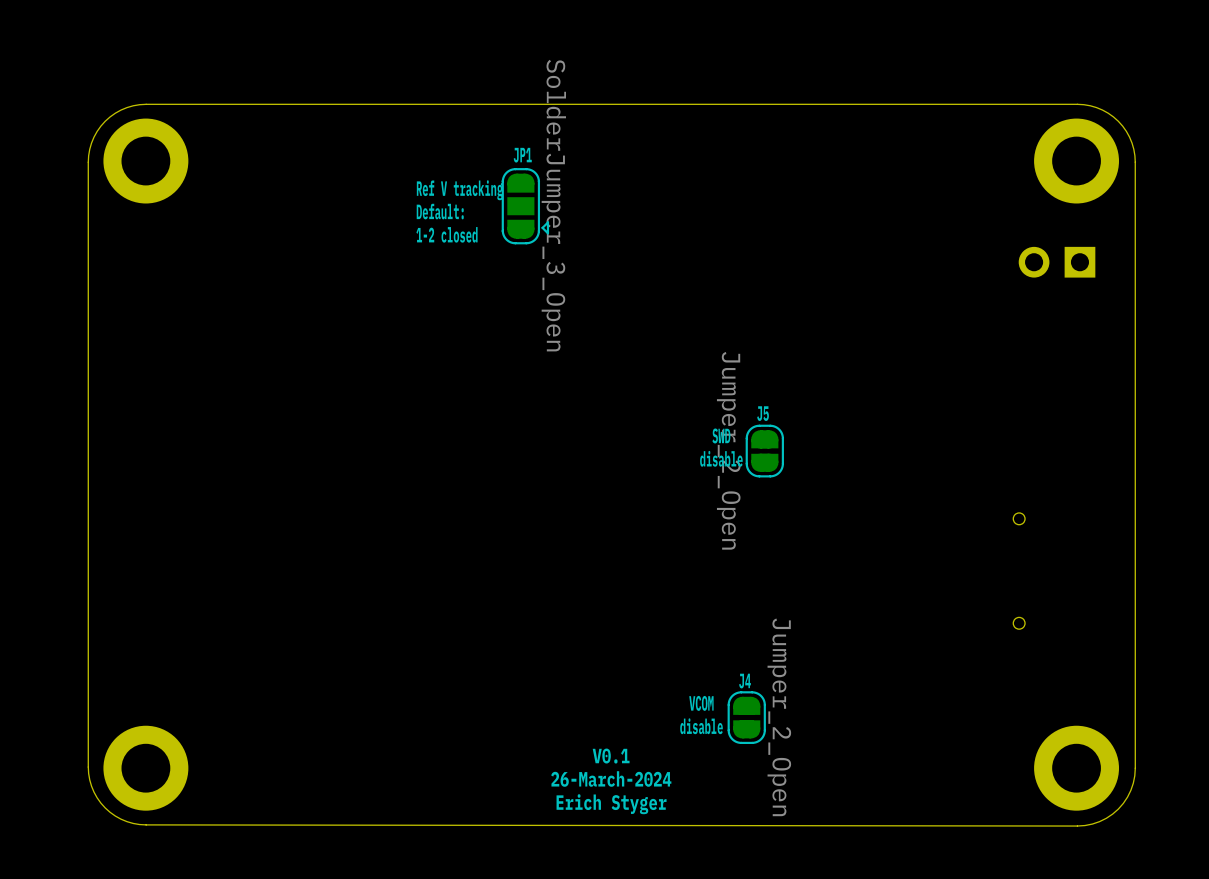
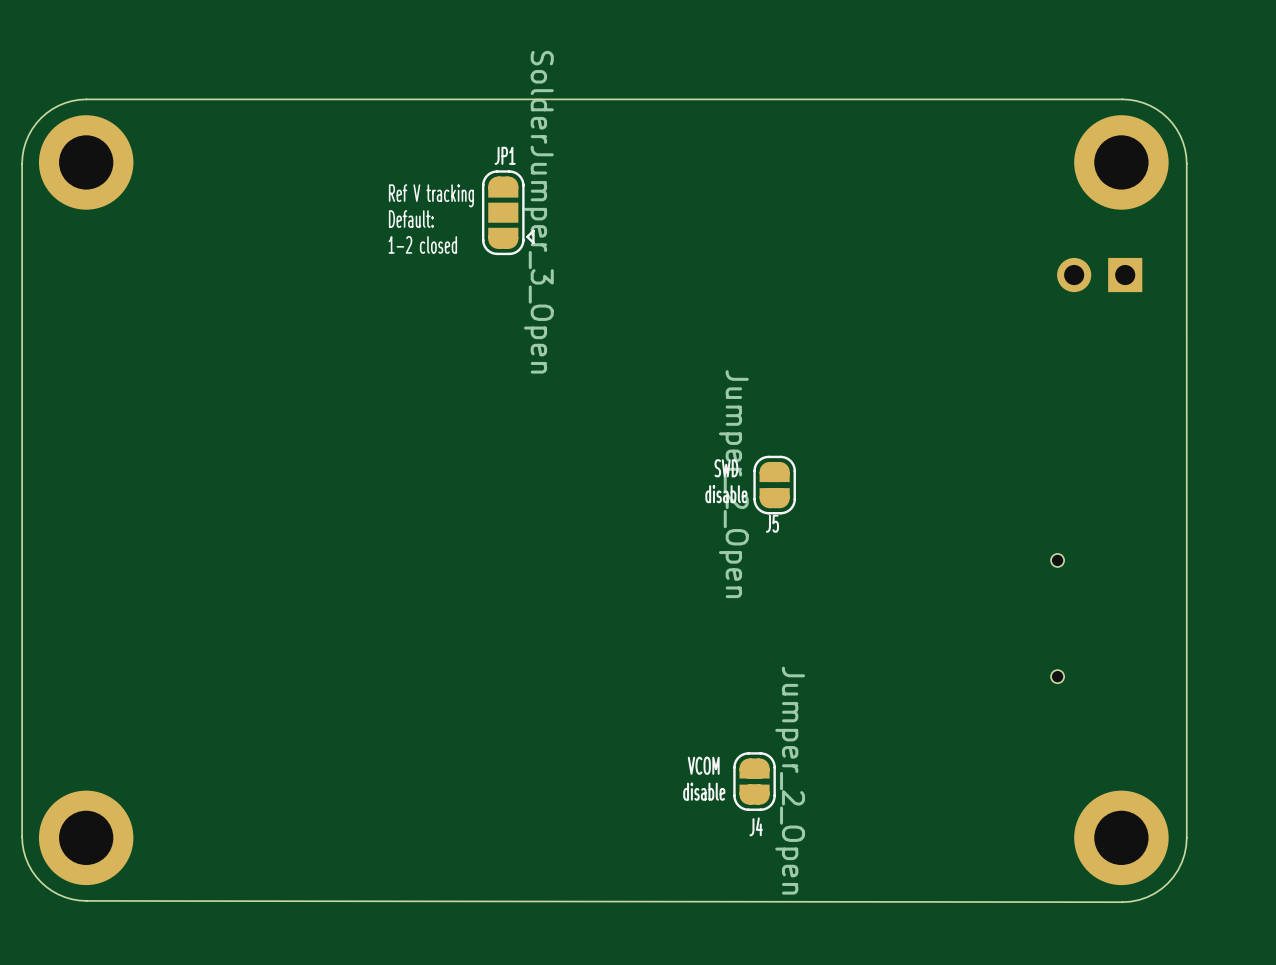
J5 name position: J5 (763, 413) -> J5 (772, 523)
J4 name position: J4 (745, 681) -> J4 (756, 826)
text: V0.1 (611, 756) -> none
text: 26-March-2024 (611, 778) -> none
text: Erich Styger (611, 804) -> none

